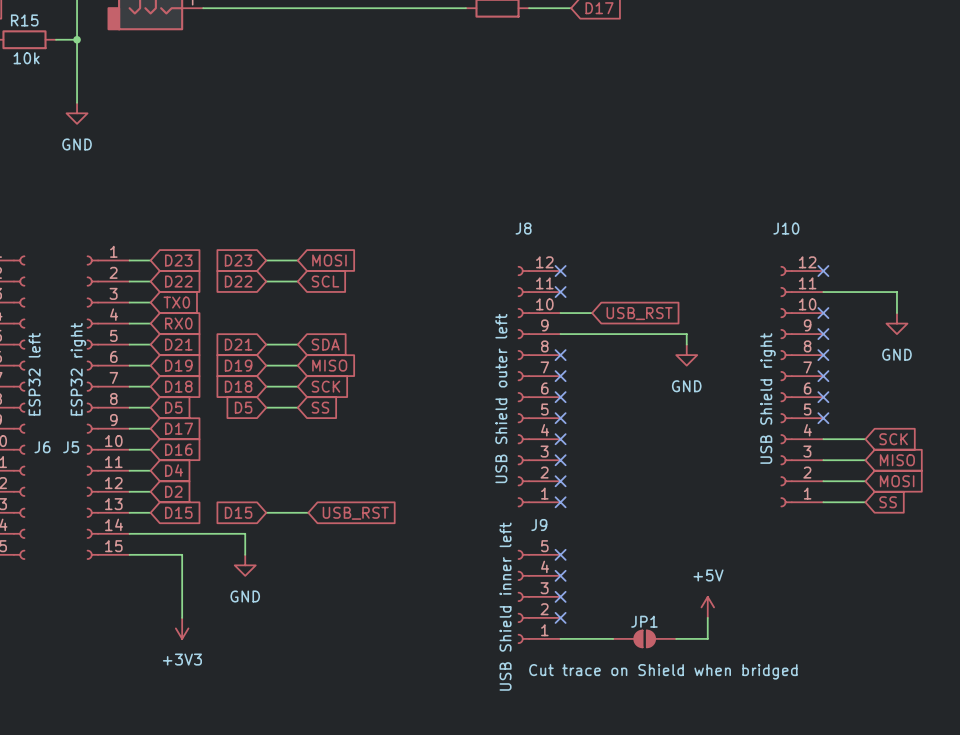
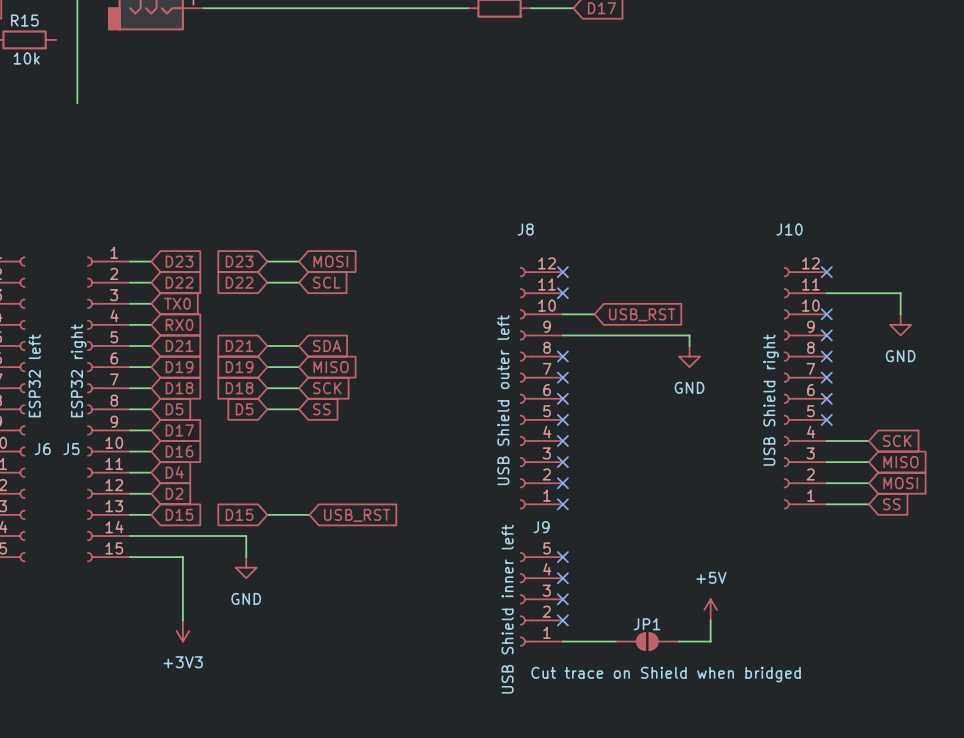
wire: (56, 39) (77, 39) -> none
junction: (77, 39) -> none
power symbol: GND (77, 113) -> none

